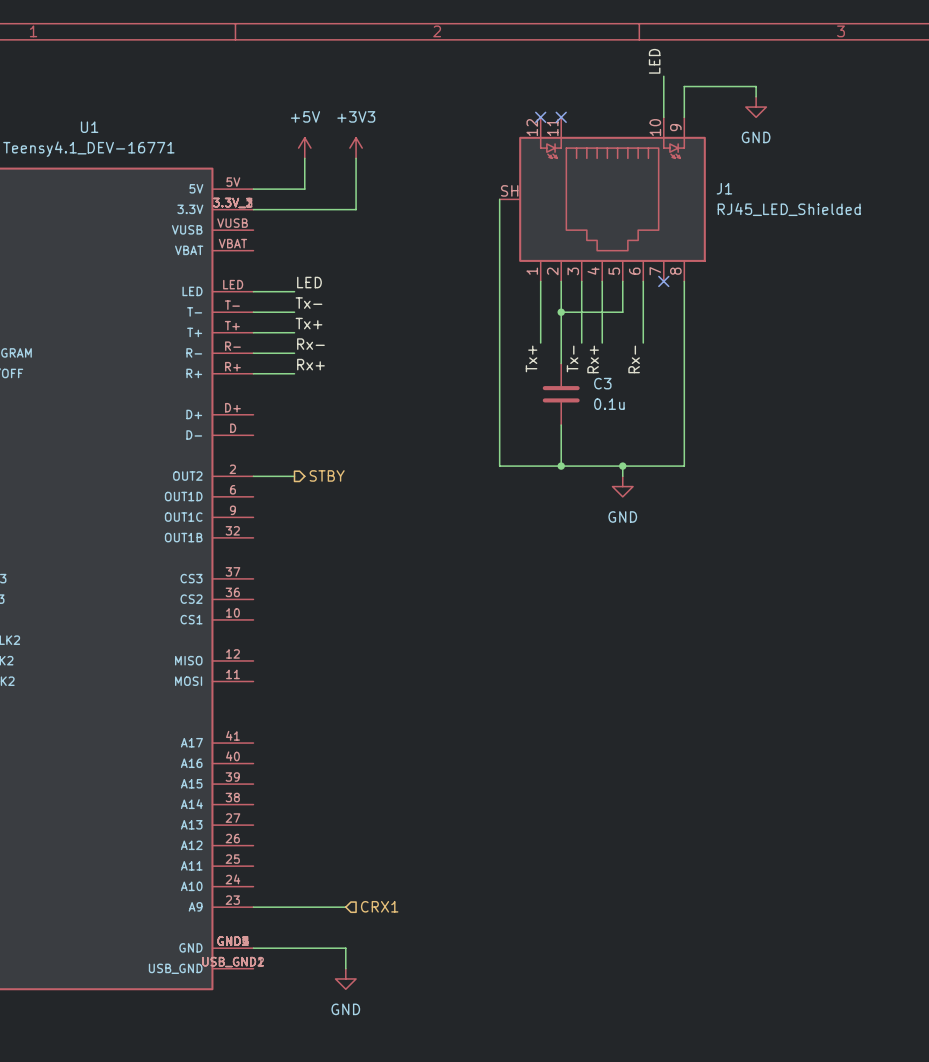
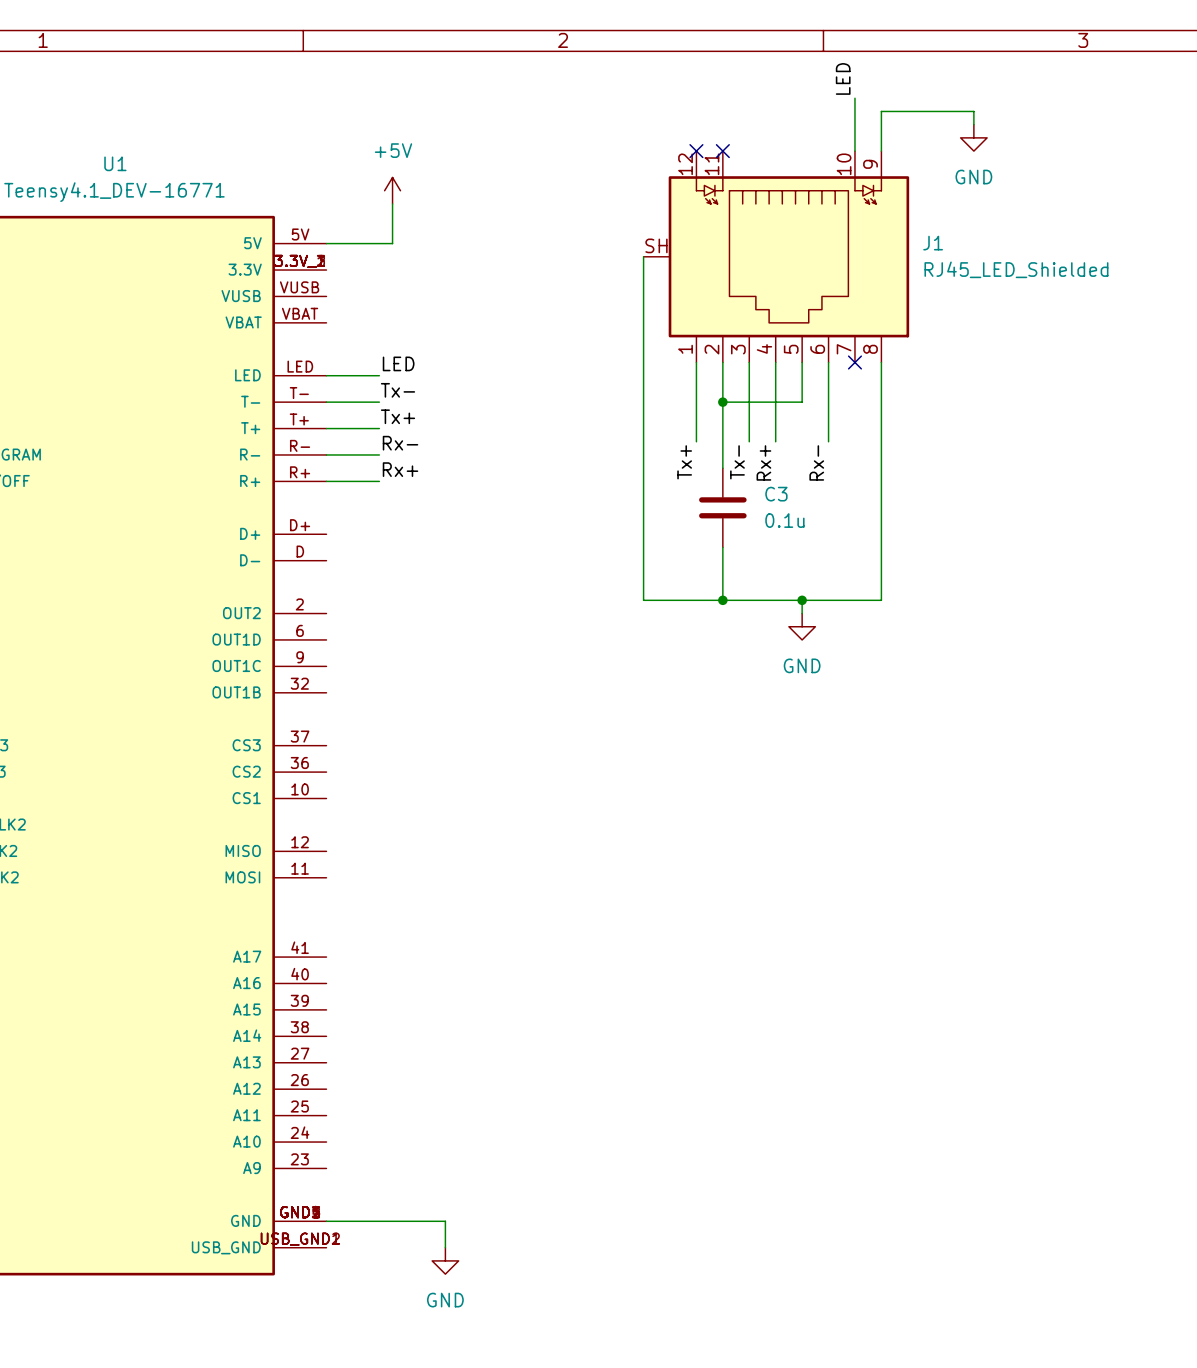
power symbol: +3V3 (356, 148) -> none
wire: (356, 158) (356, 209) (253, 209) -> none
hierarchical label: STBY (327, 475) -> none
wire: (253, 476) (294, 476) -> none
hierarchical label: CRX1 (379, 906) -> none
wire: (253, 907) (345, 907) -> none

